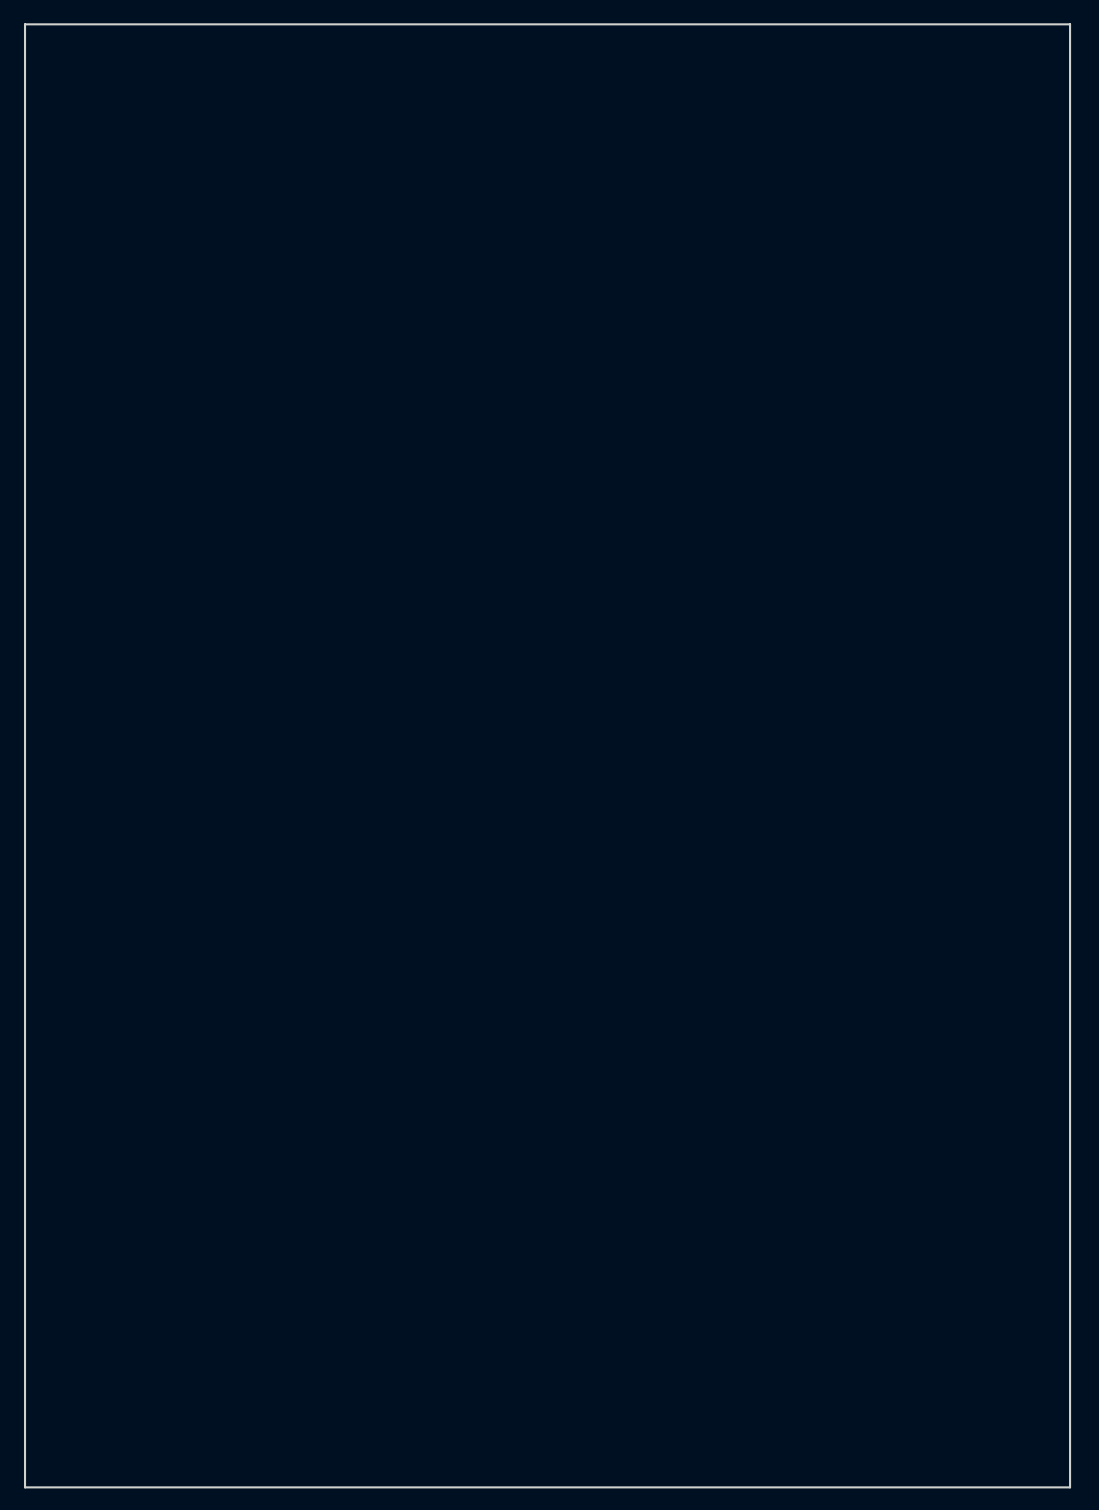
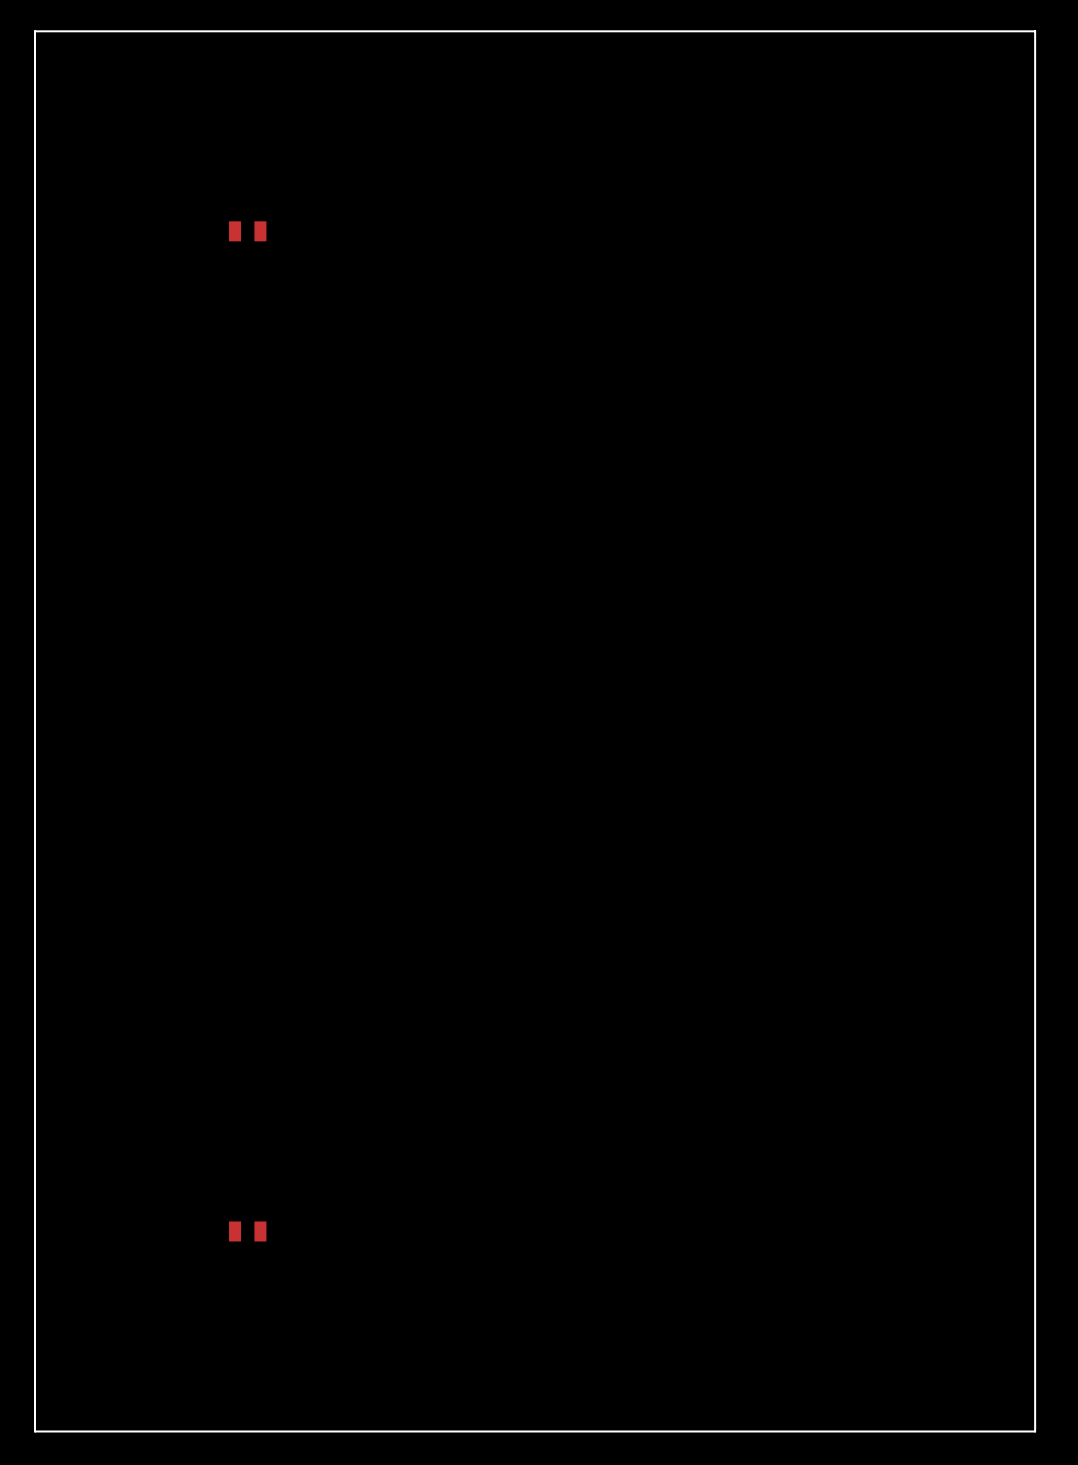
part: none -> (247, 231)
part: none -> (247, 1231)

